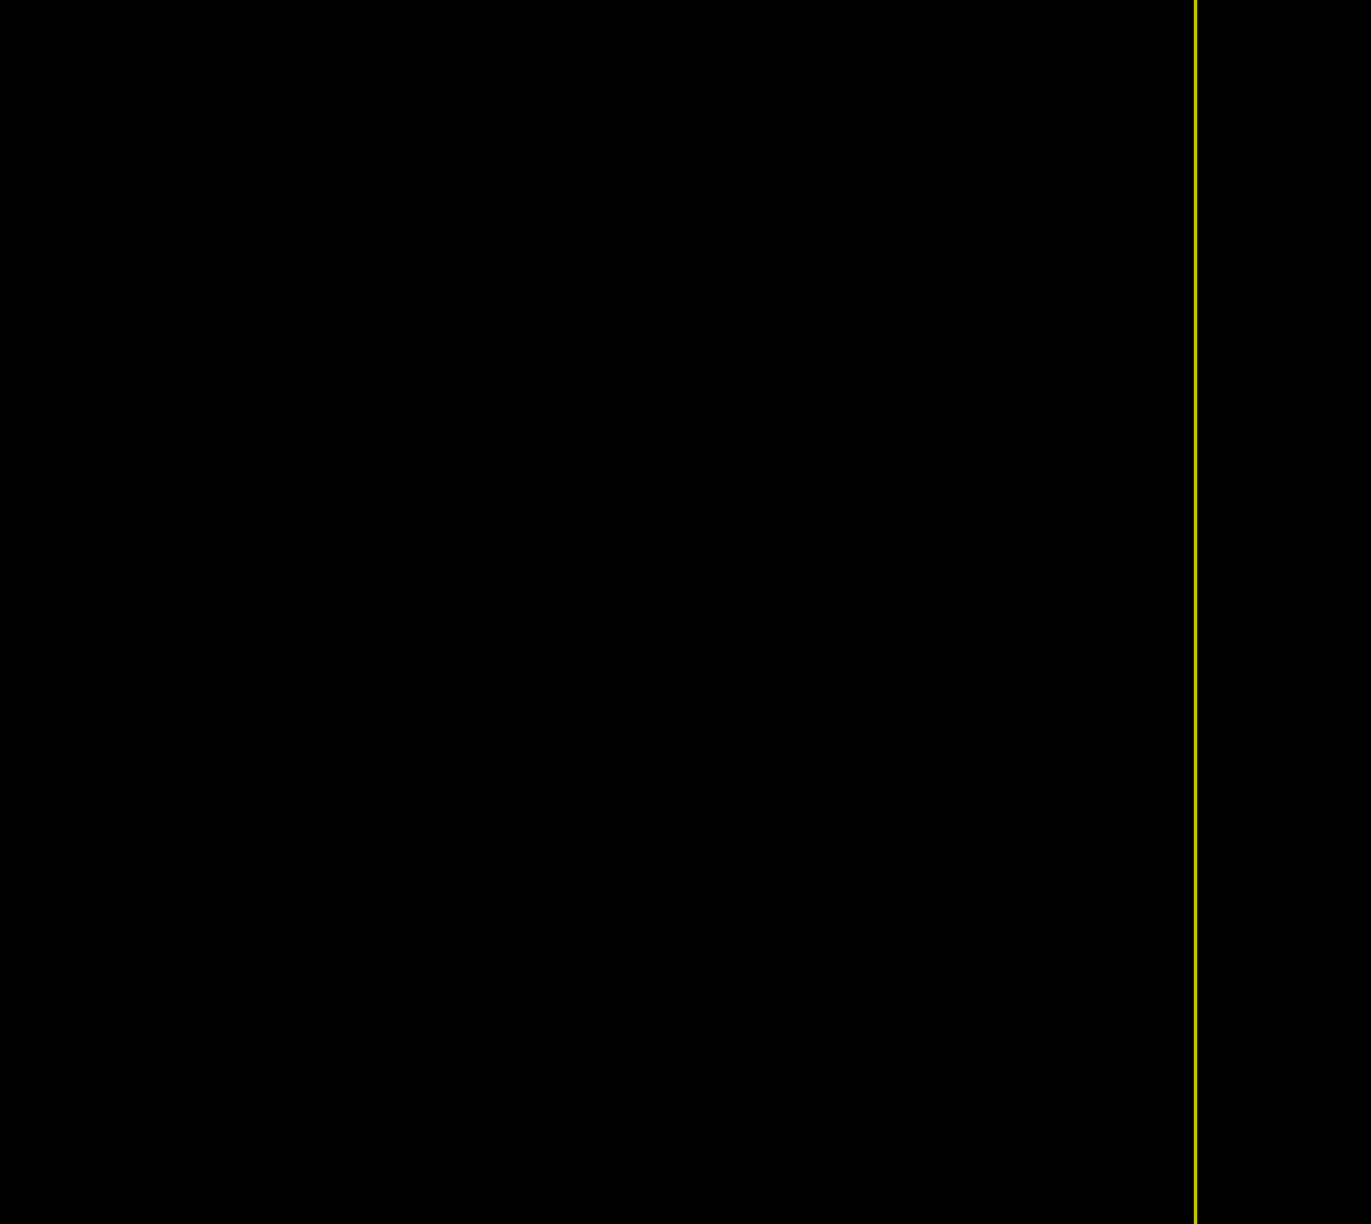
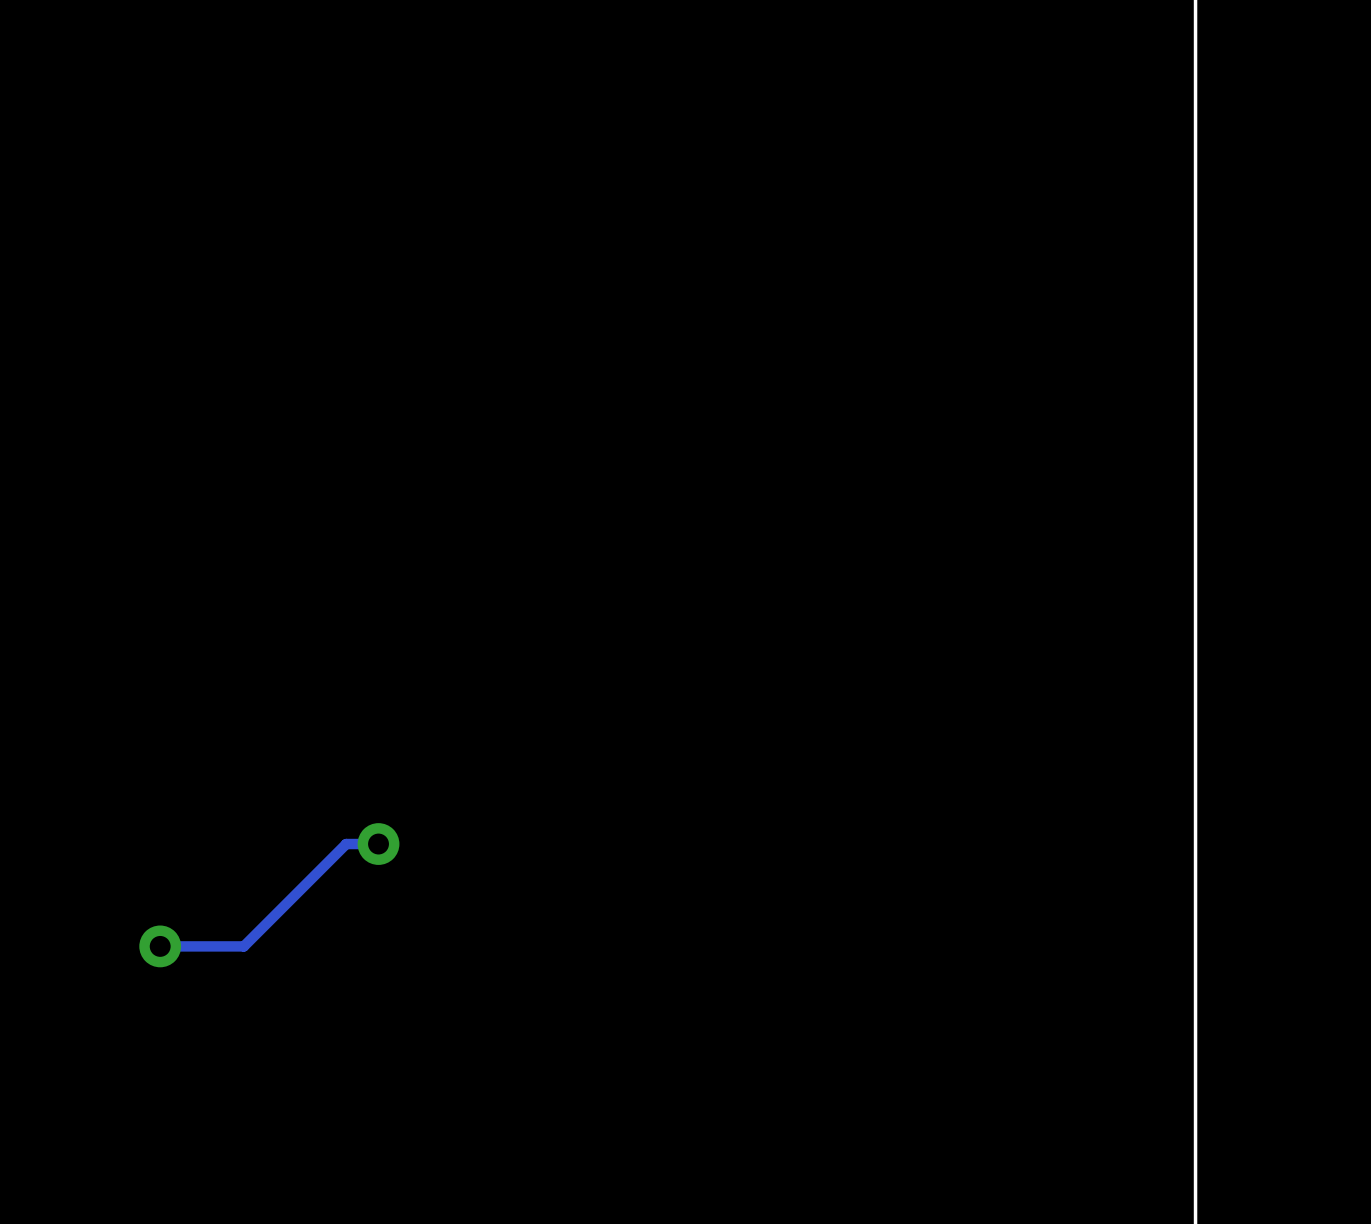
track: none -> (378, 844) (346, 844) (243, 946) (160, 946)
via: none -> (378, 844)
via: none -> (160, 946)

